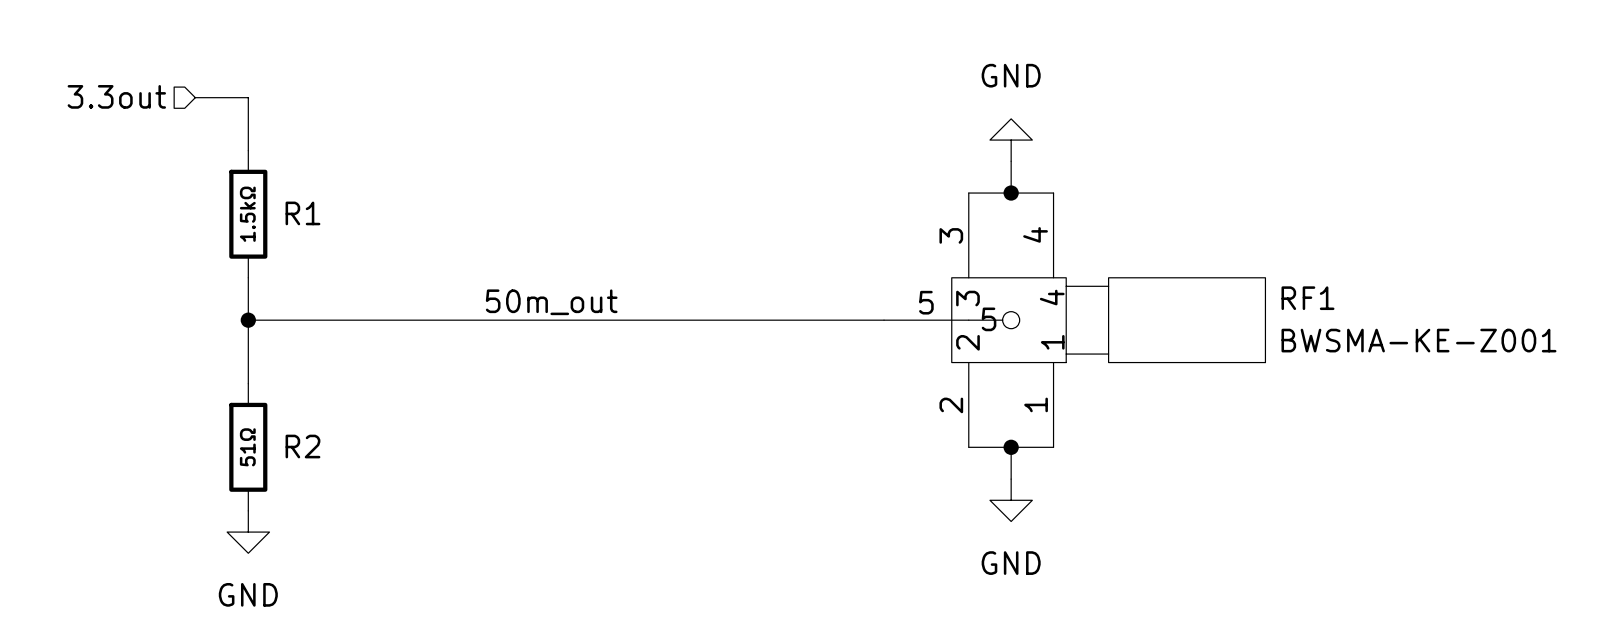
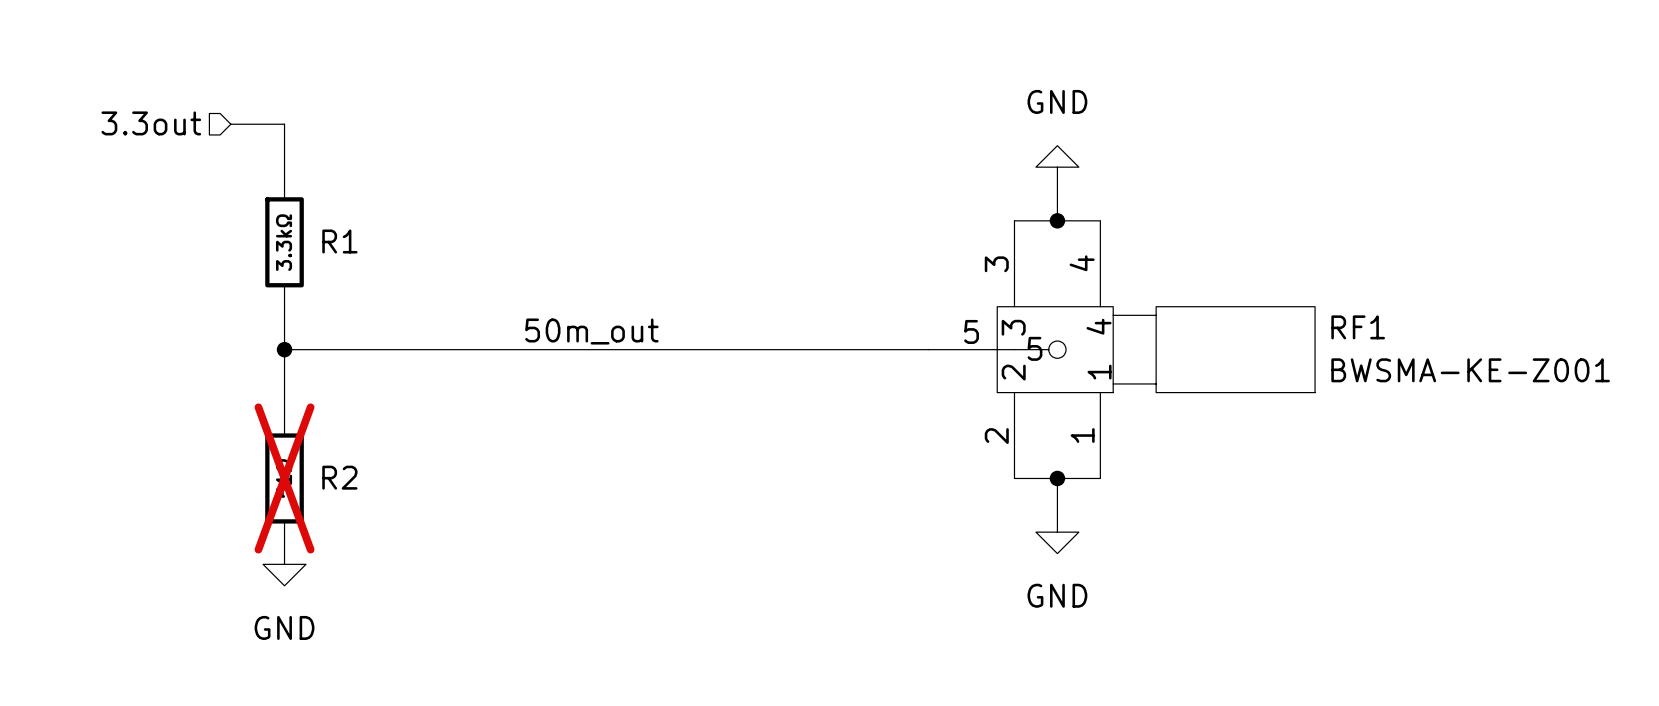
R1 value: 1.5kΩ (247, 214) -> 3.3kΩ (284, 242)
R2 do-not-place cross: none -> (284, 478)

